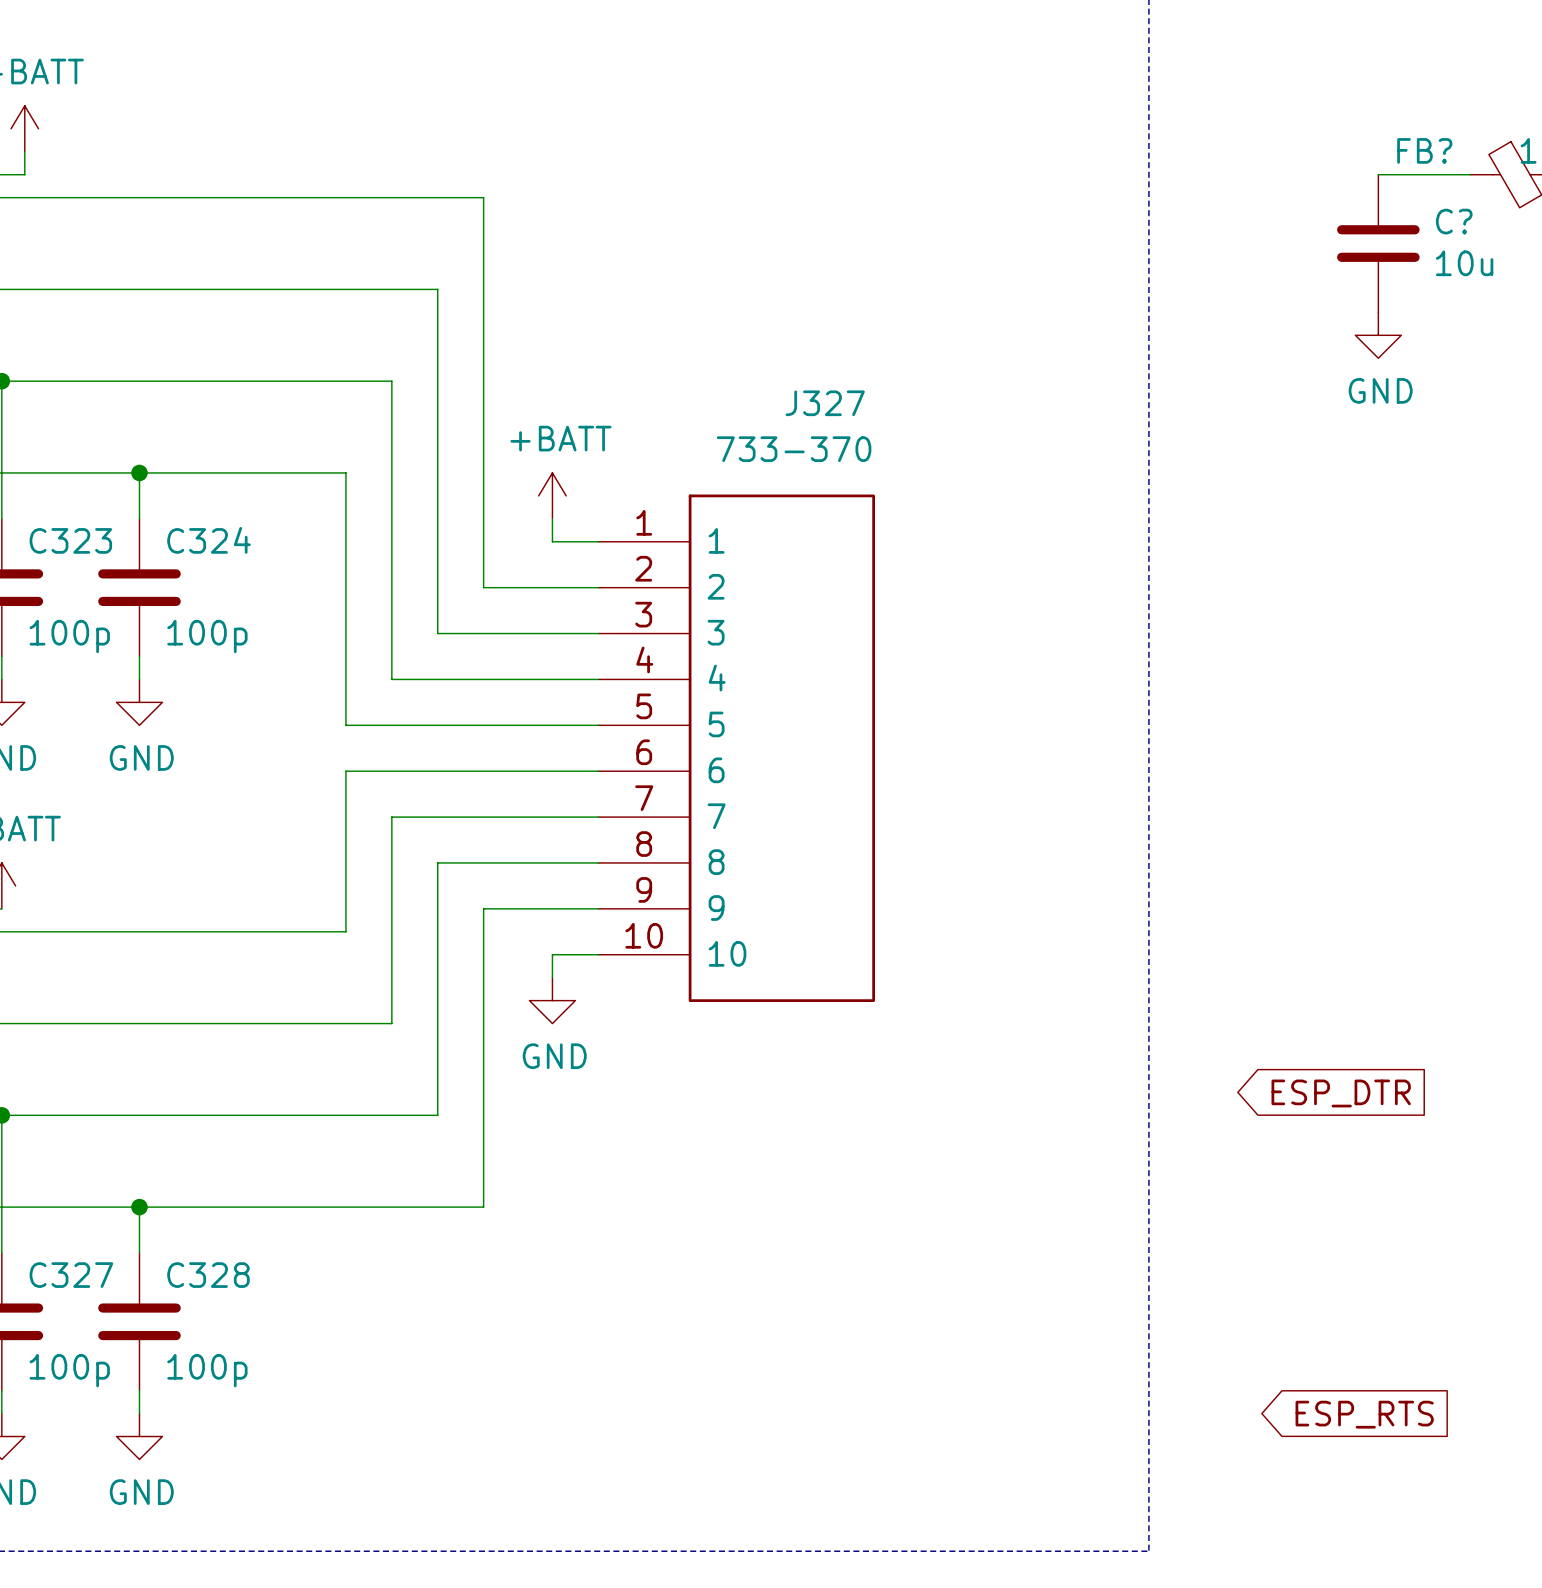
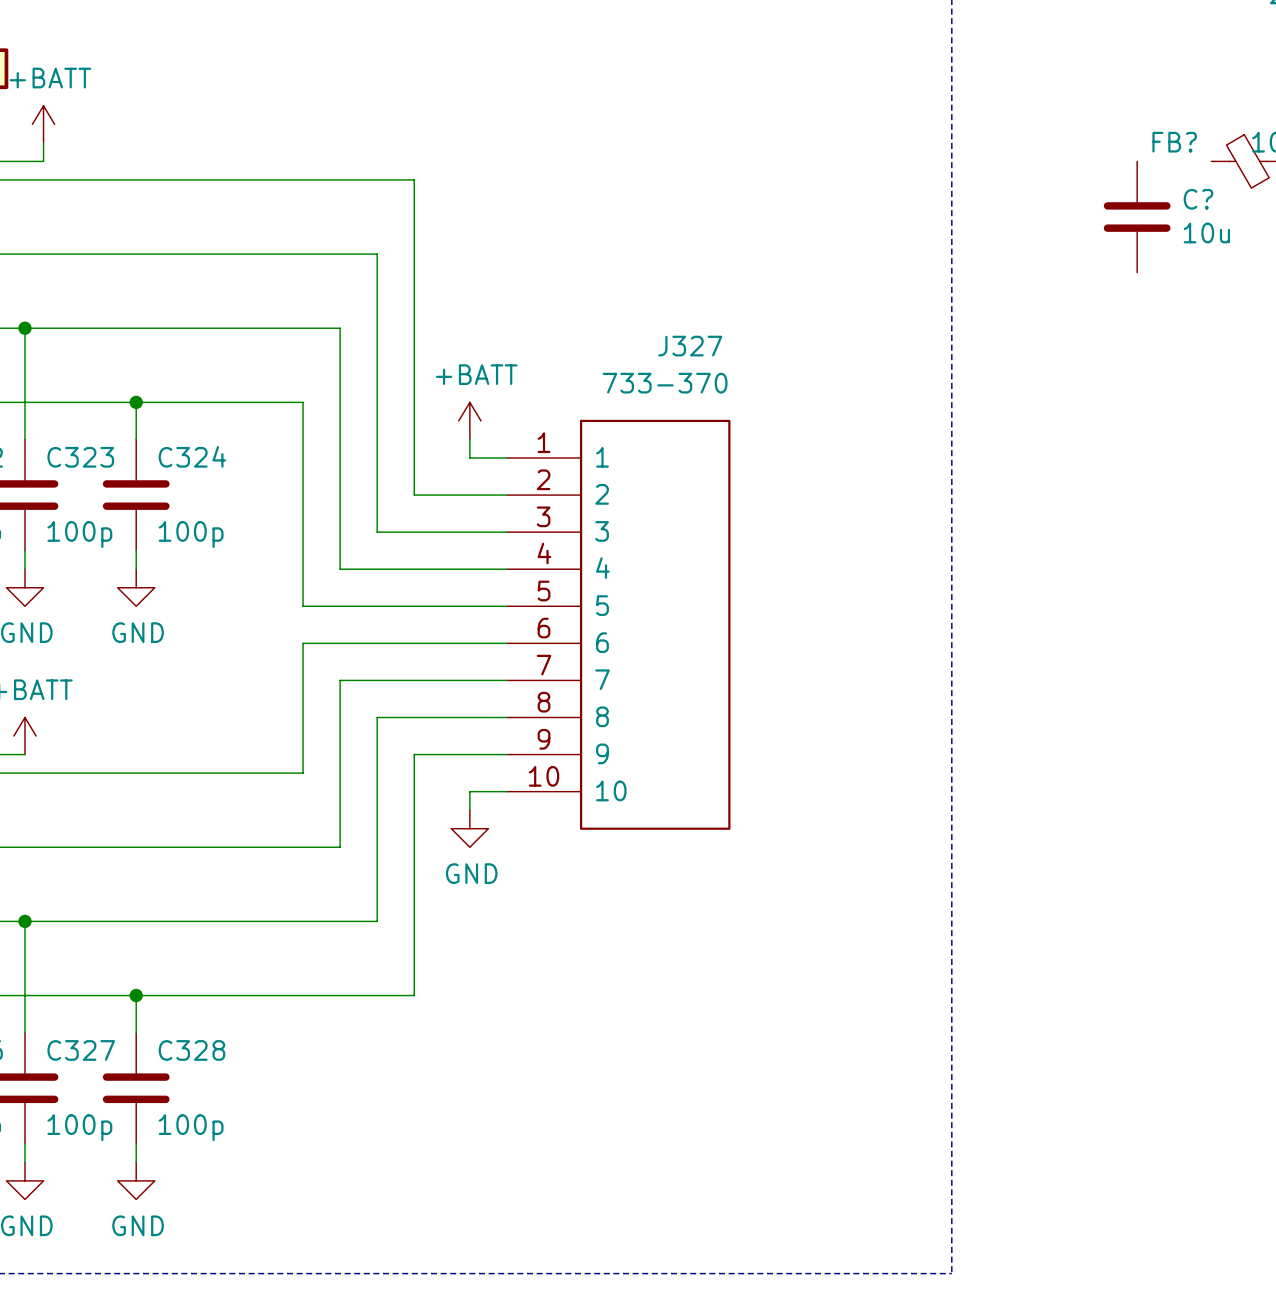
wire: (1378, 174) (1470, 174) -> none
power symbol: GND (1378, 335) -> none
global label: ESP_DTR (1341, 1093) -> none
global label: ESP_RTS (1364, 1414) -> none

